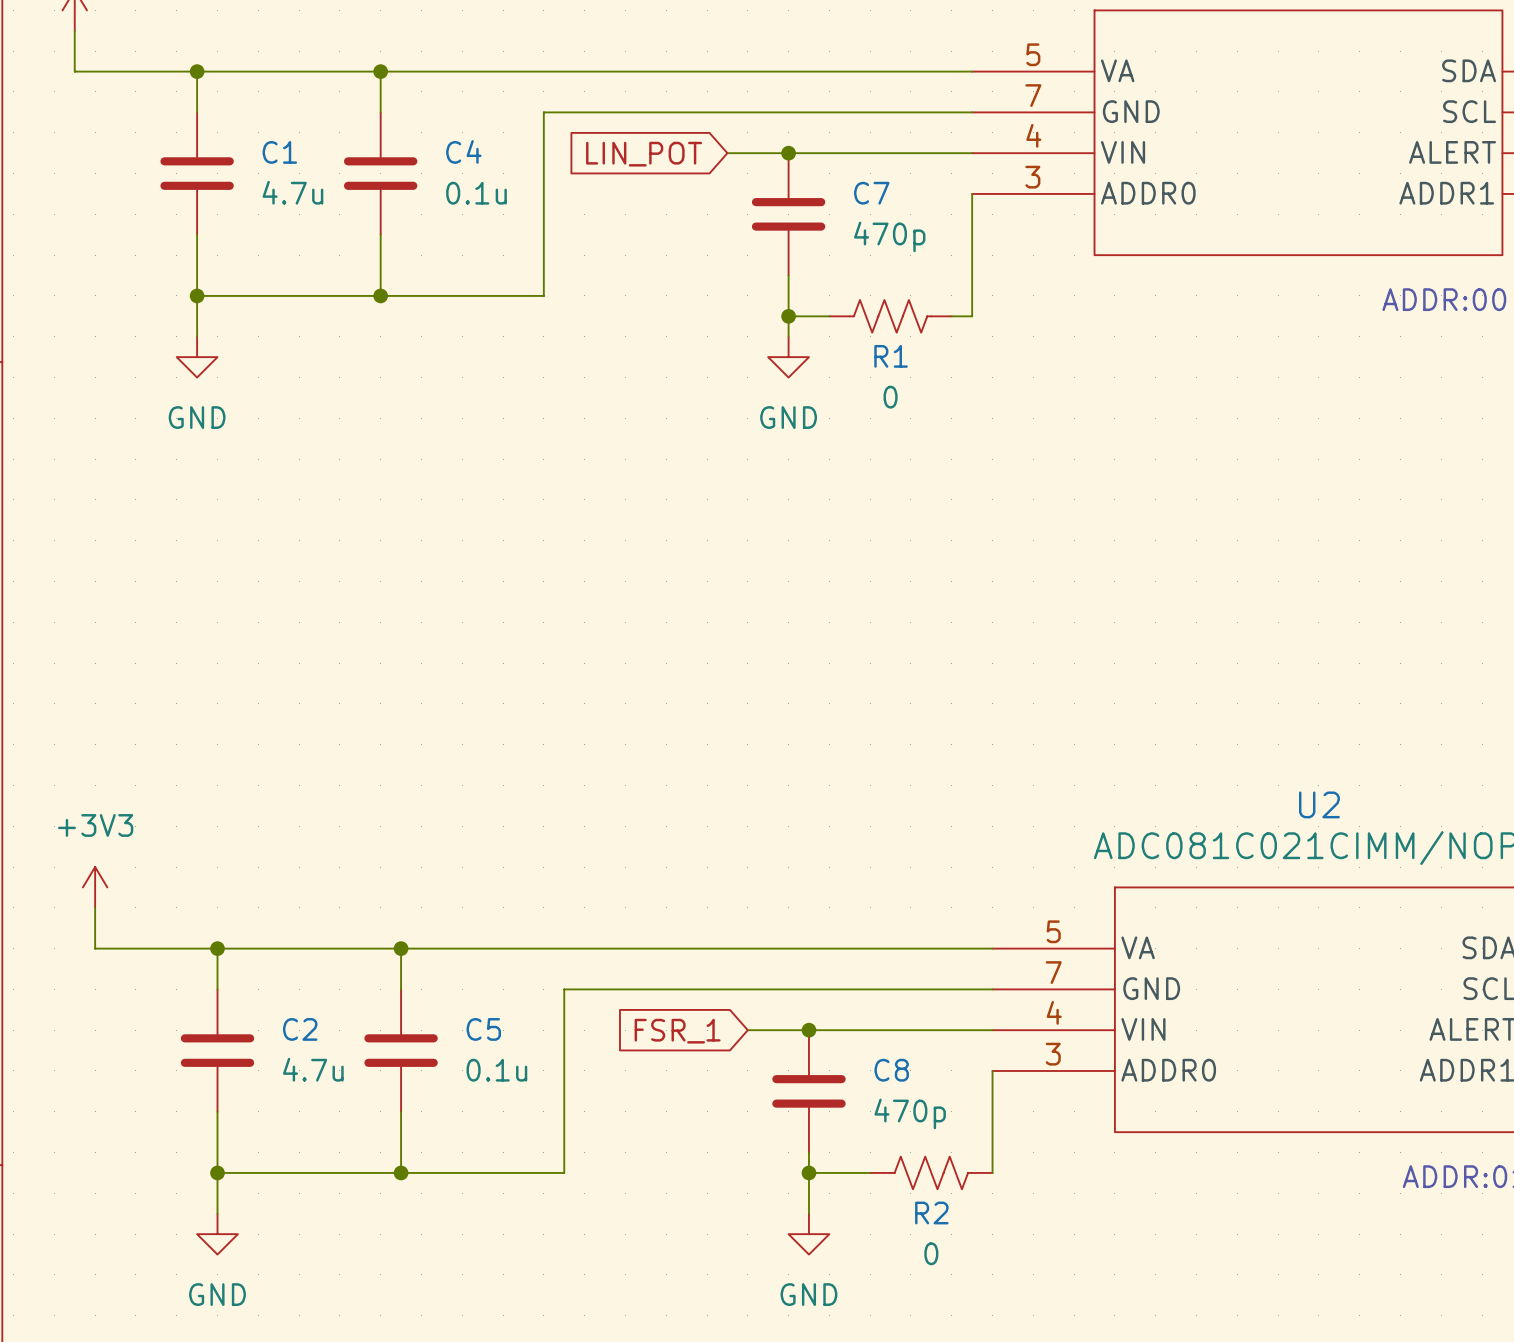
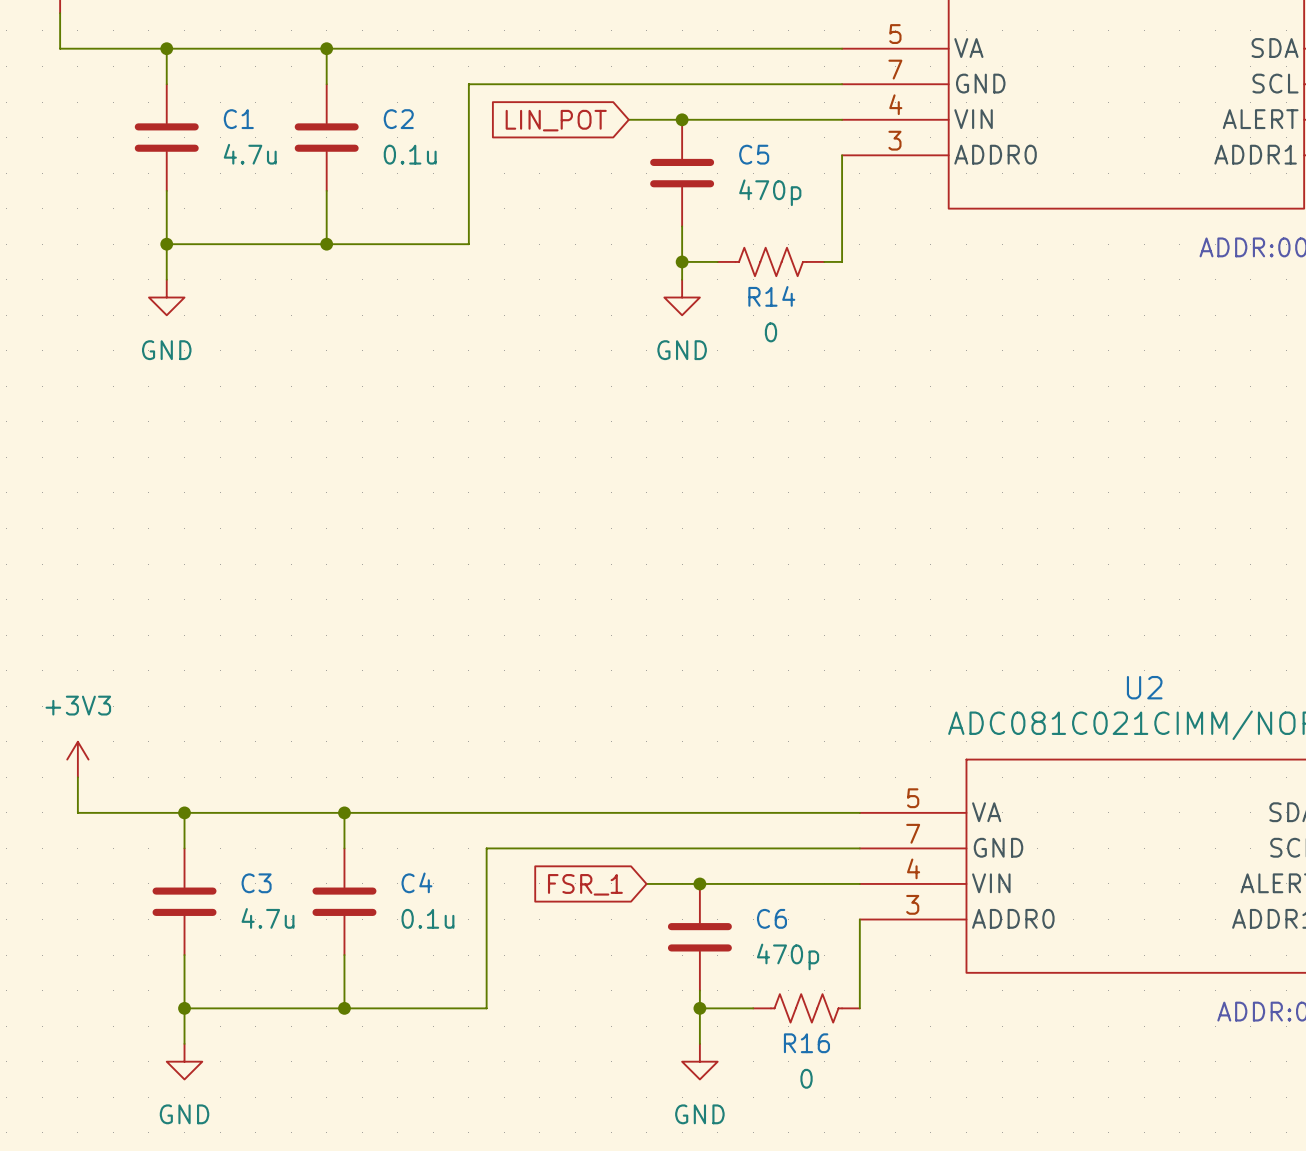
C4 name: C4 (463, 151) -> C2 (398, 119)
C7 name: C7 (871, 193) -> C5 (754, 154)
R1 name: R1 (891, 356) -> R14 (771, 296)
C2 name: C2 (300, 1029) -> C3 (256, 883)
C5 name: C5 (483, 1029) -> C4 (416, 882)
C8 name: C8 (891, 1070) -> C6 (771, 918)
R2 name: R2 (931, 1212) -> R16 (806, 1043)

